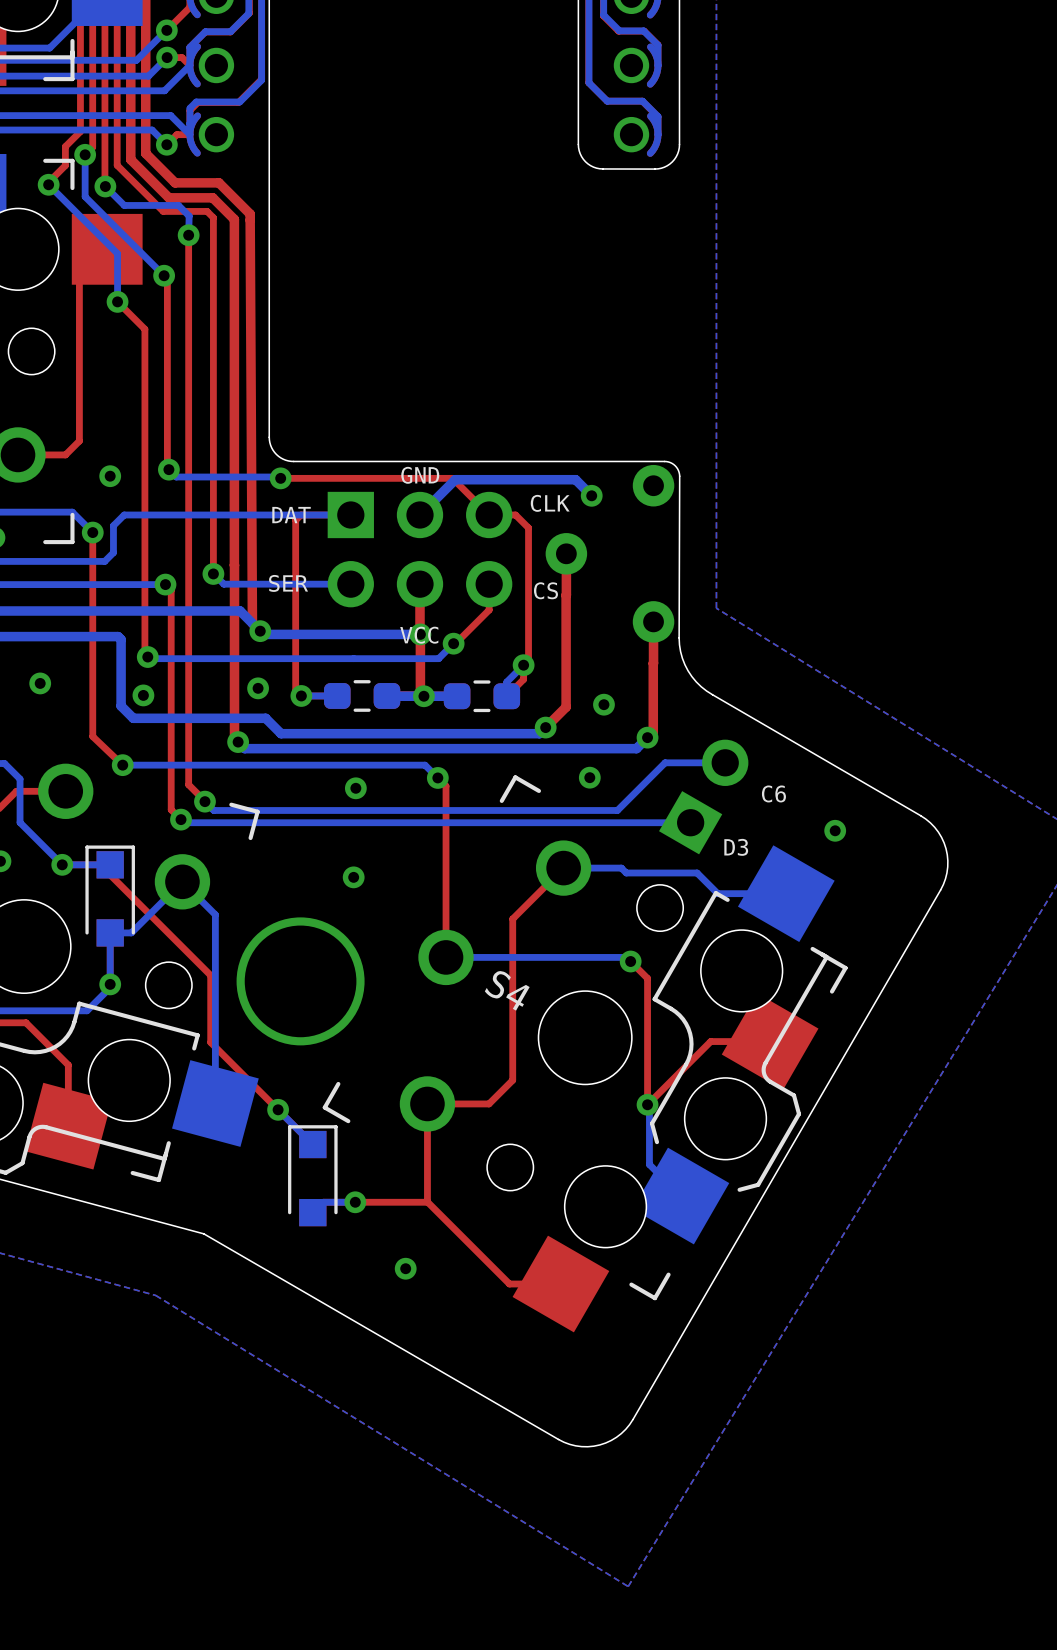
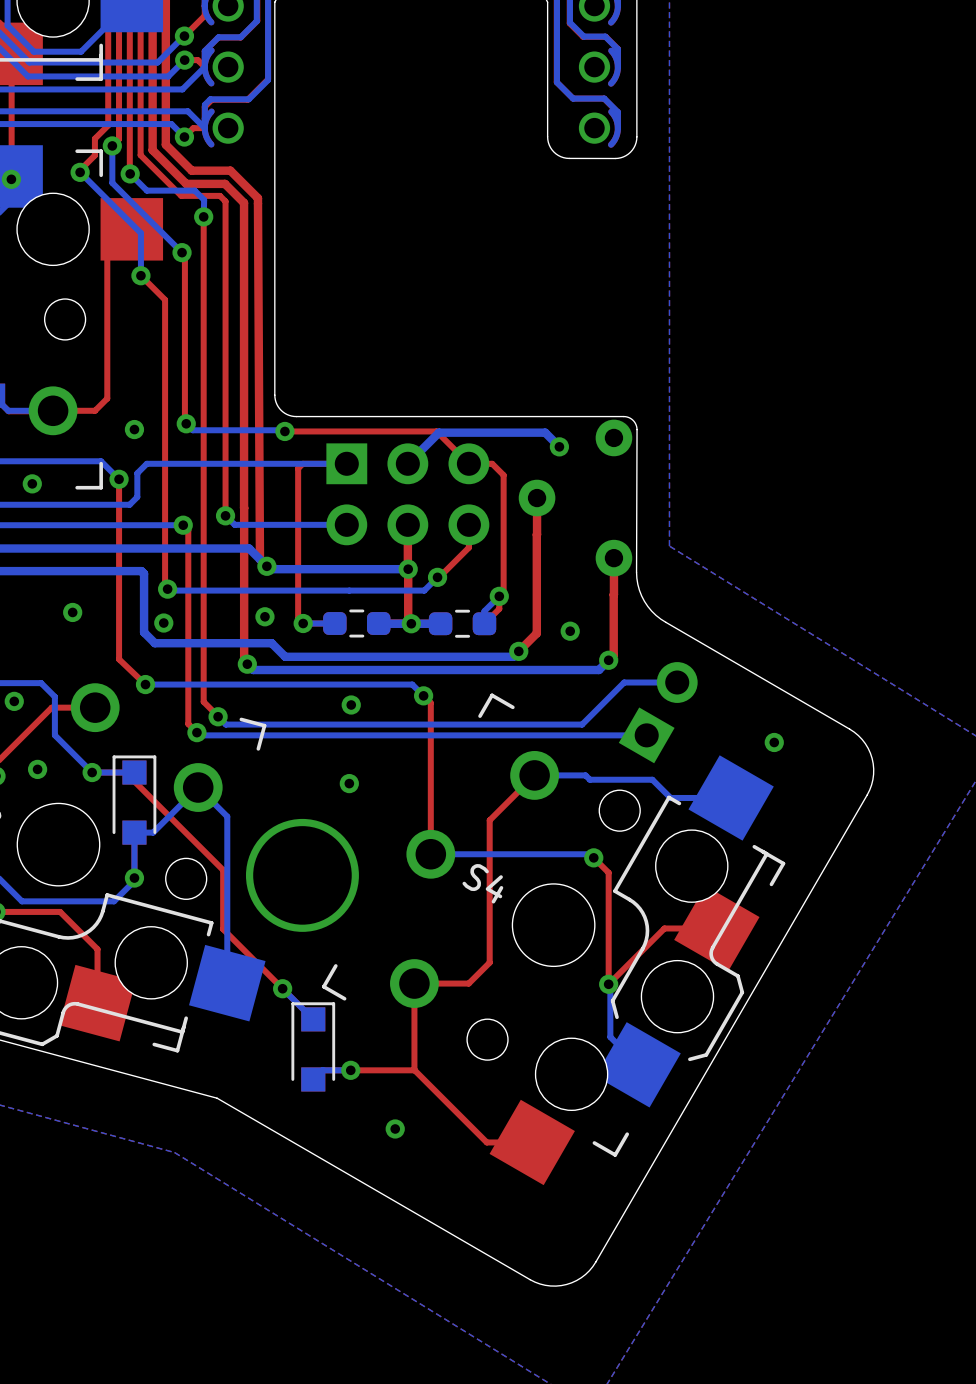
text: GND (420, 475) -> none
text: CLK (550, 503) -> none
text: DAT (291, 515) -> none
text: SER (288, 583) -> none
text: CS (545, 590) -> none
text: VCC (419, 635) -> none
via: (589, 777) -> none
text: C6 (773, 793) -> none
text: D3 (736, 847) -> none

